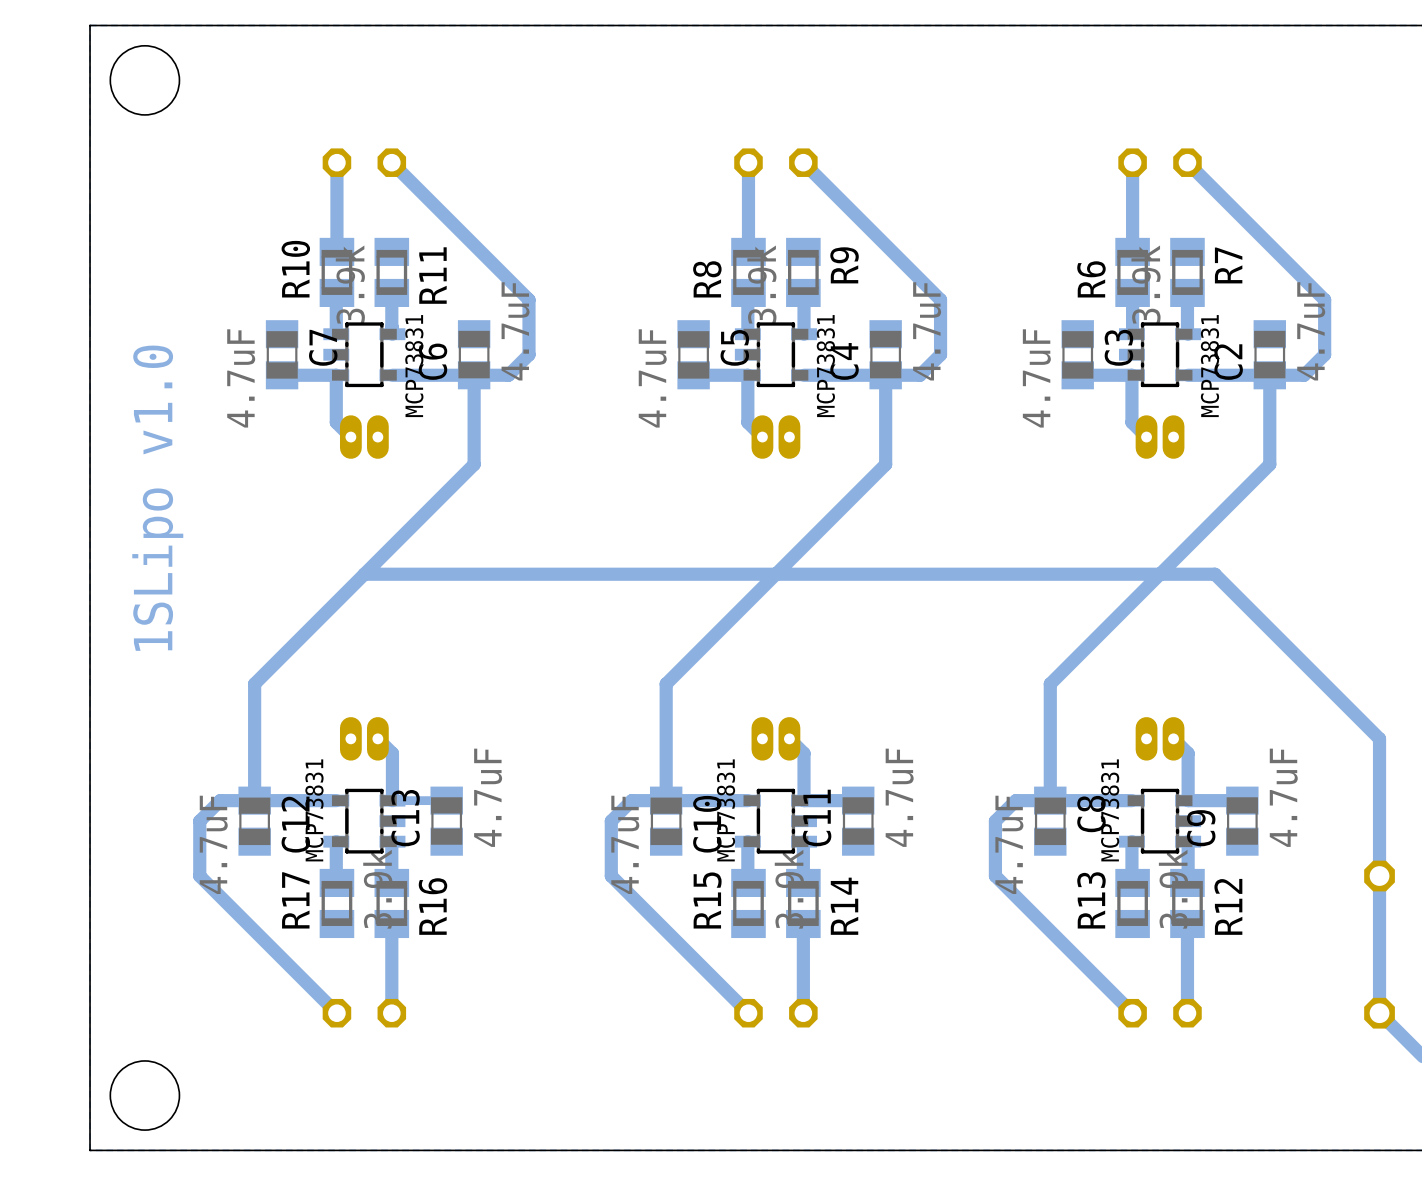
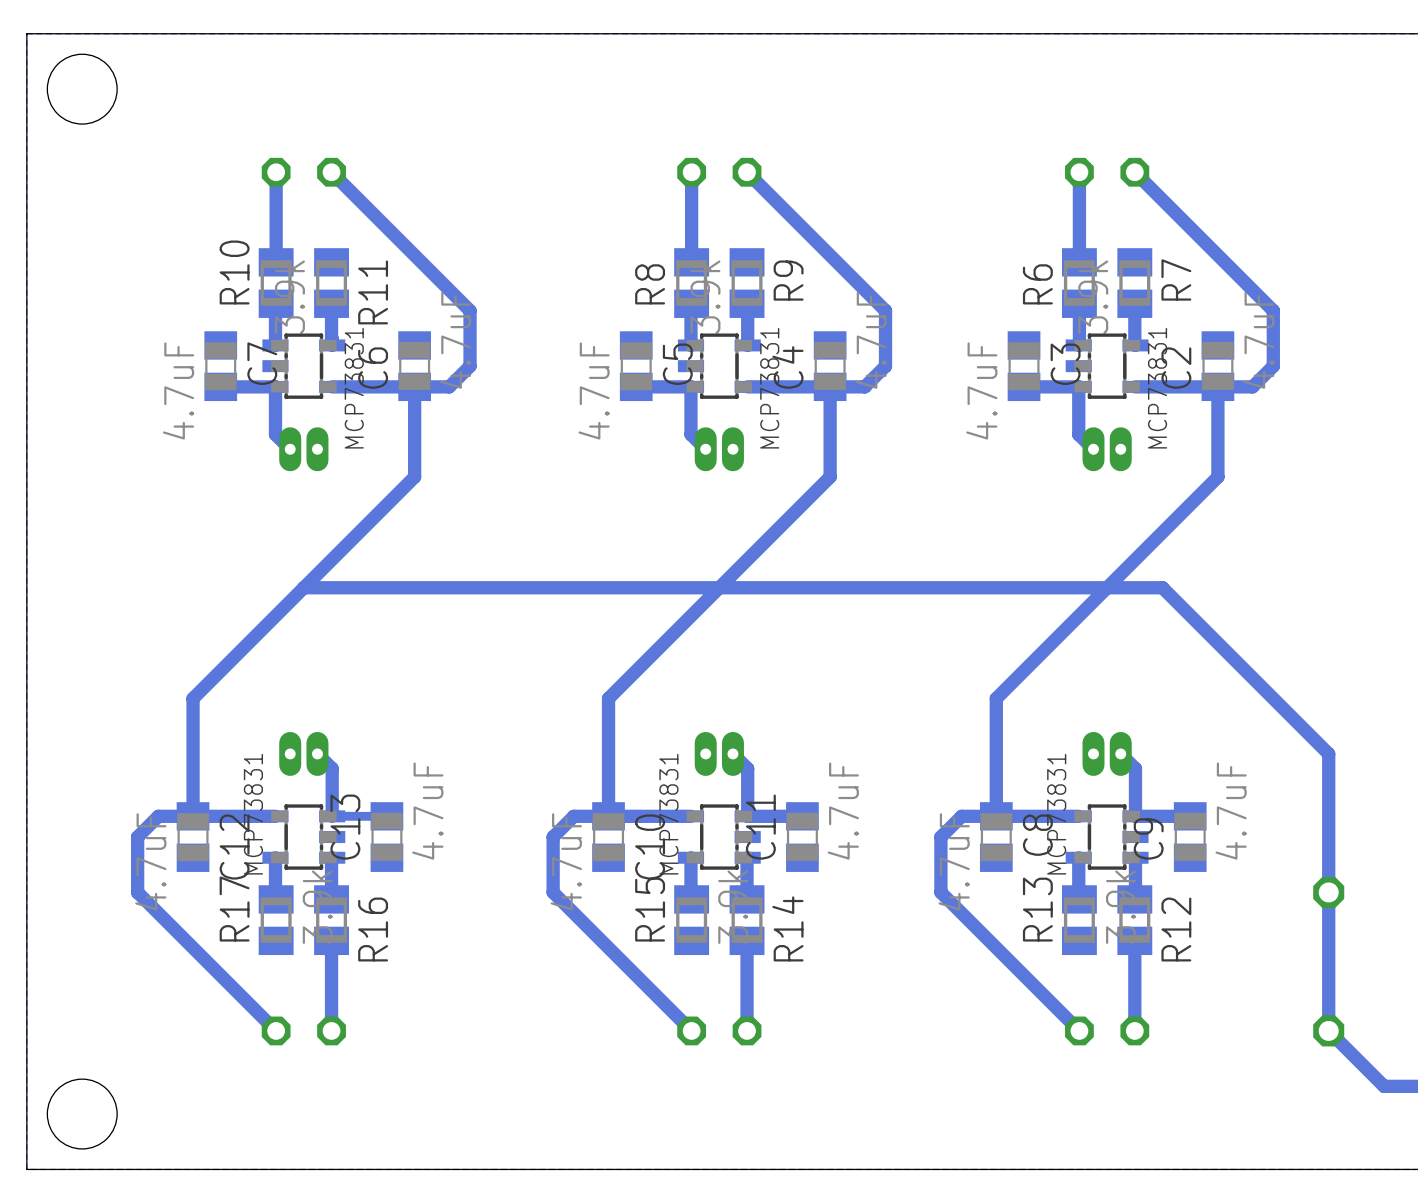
text: 1SLipo v1.0 (157, 498) -> none

